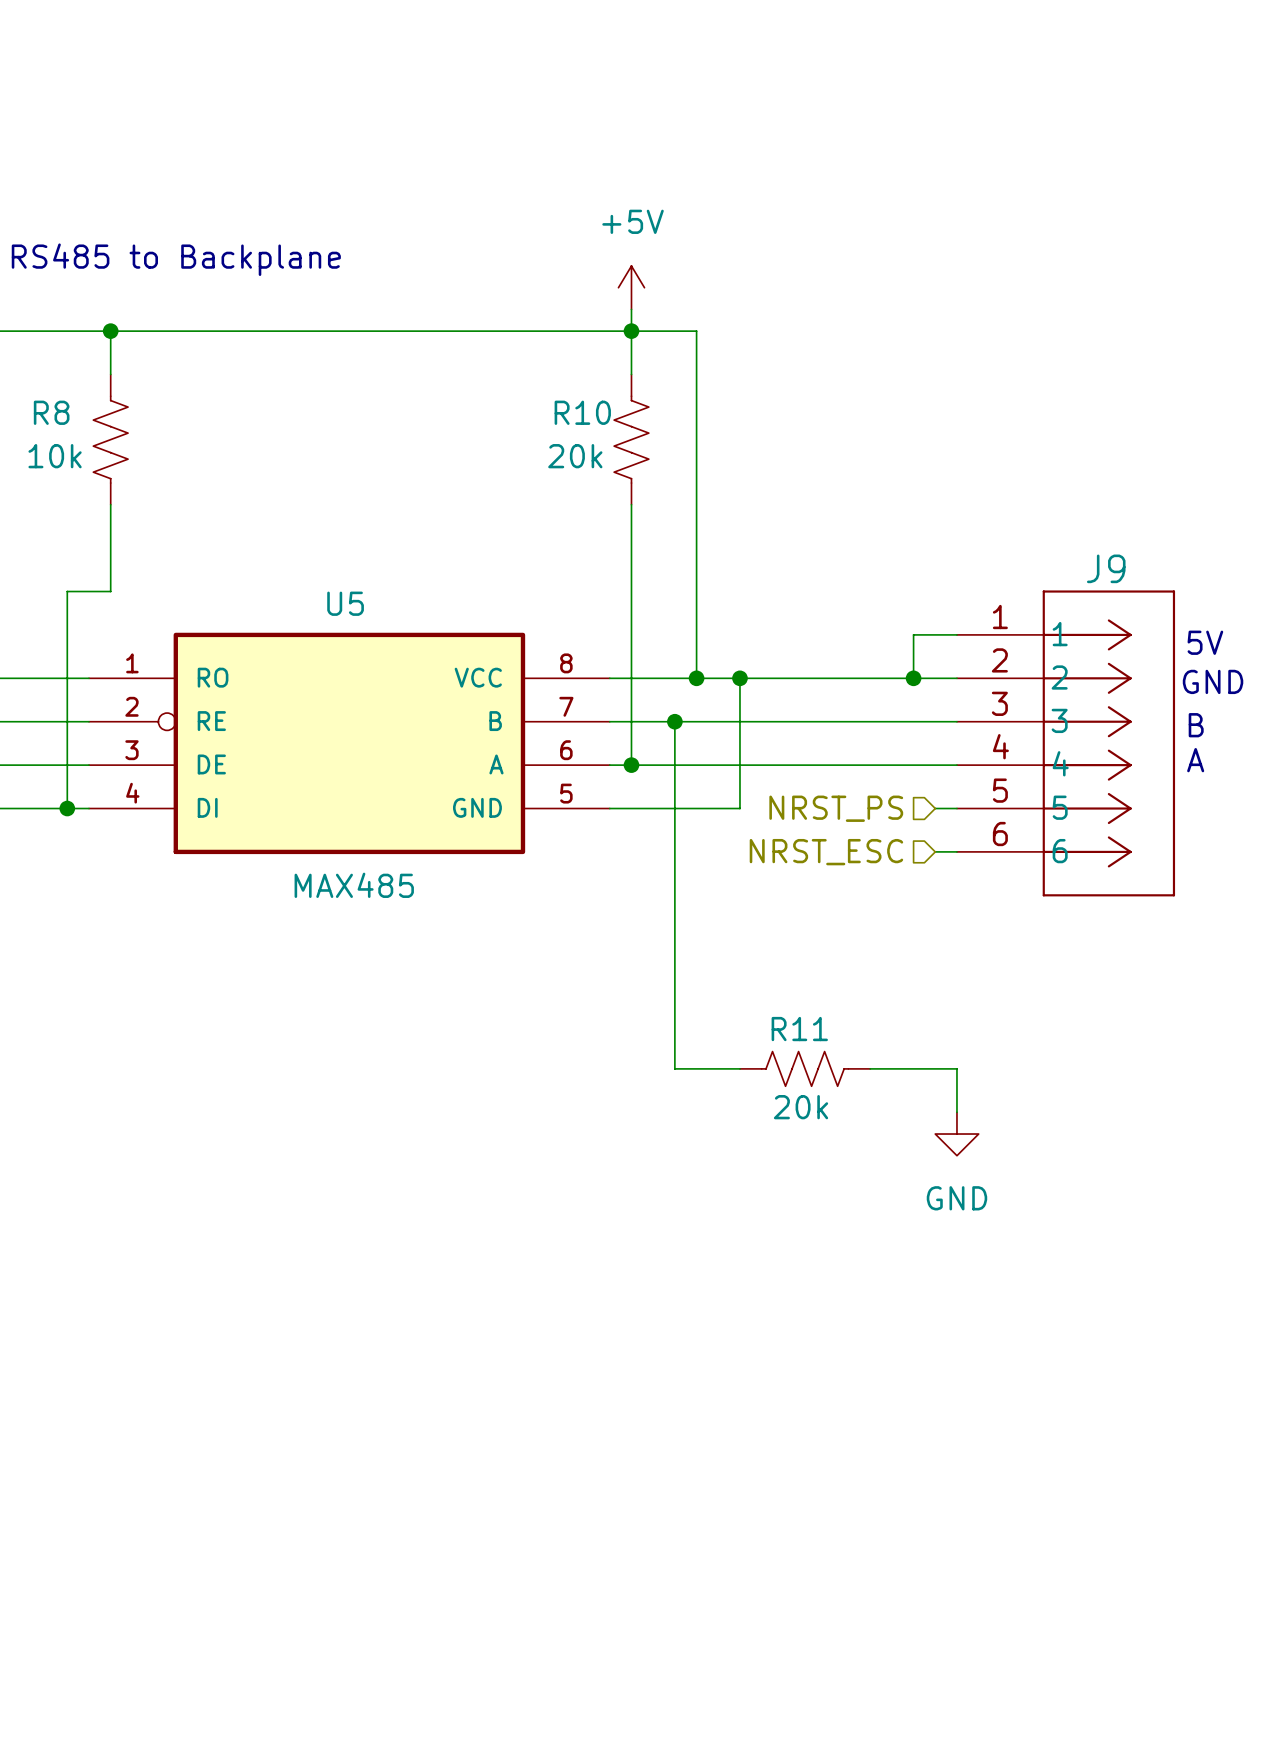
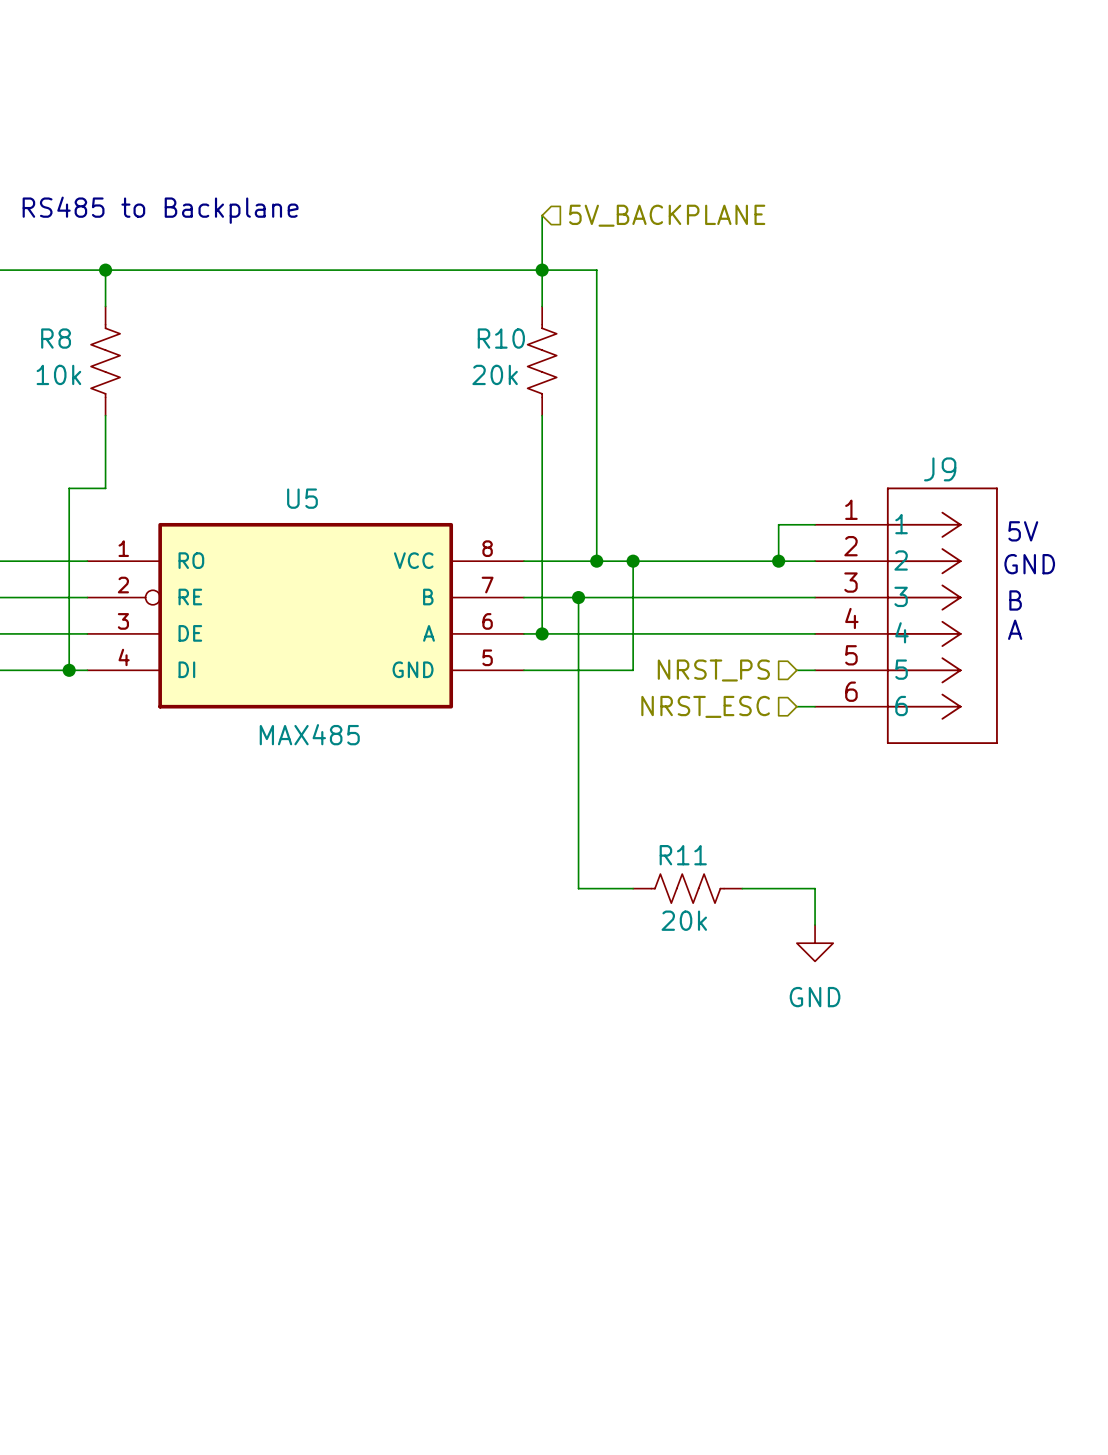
hierarchical label: none -> 5V_BACKPLANE (667, 215)
power symbol: +5V (631, 287) -> none

